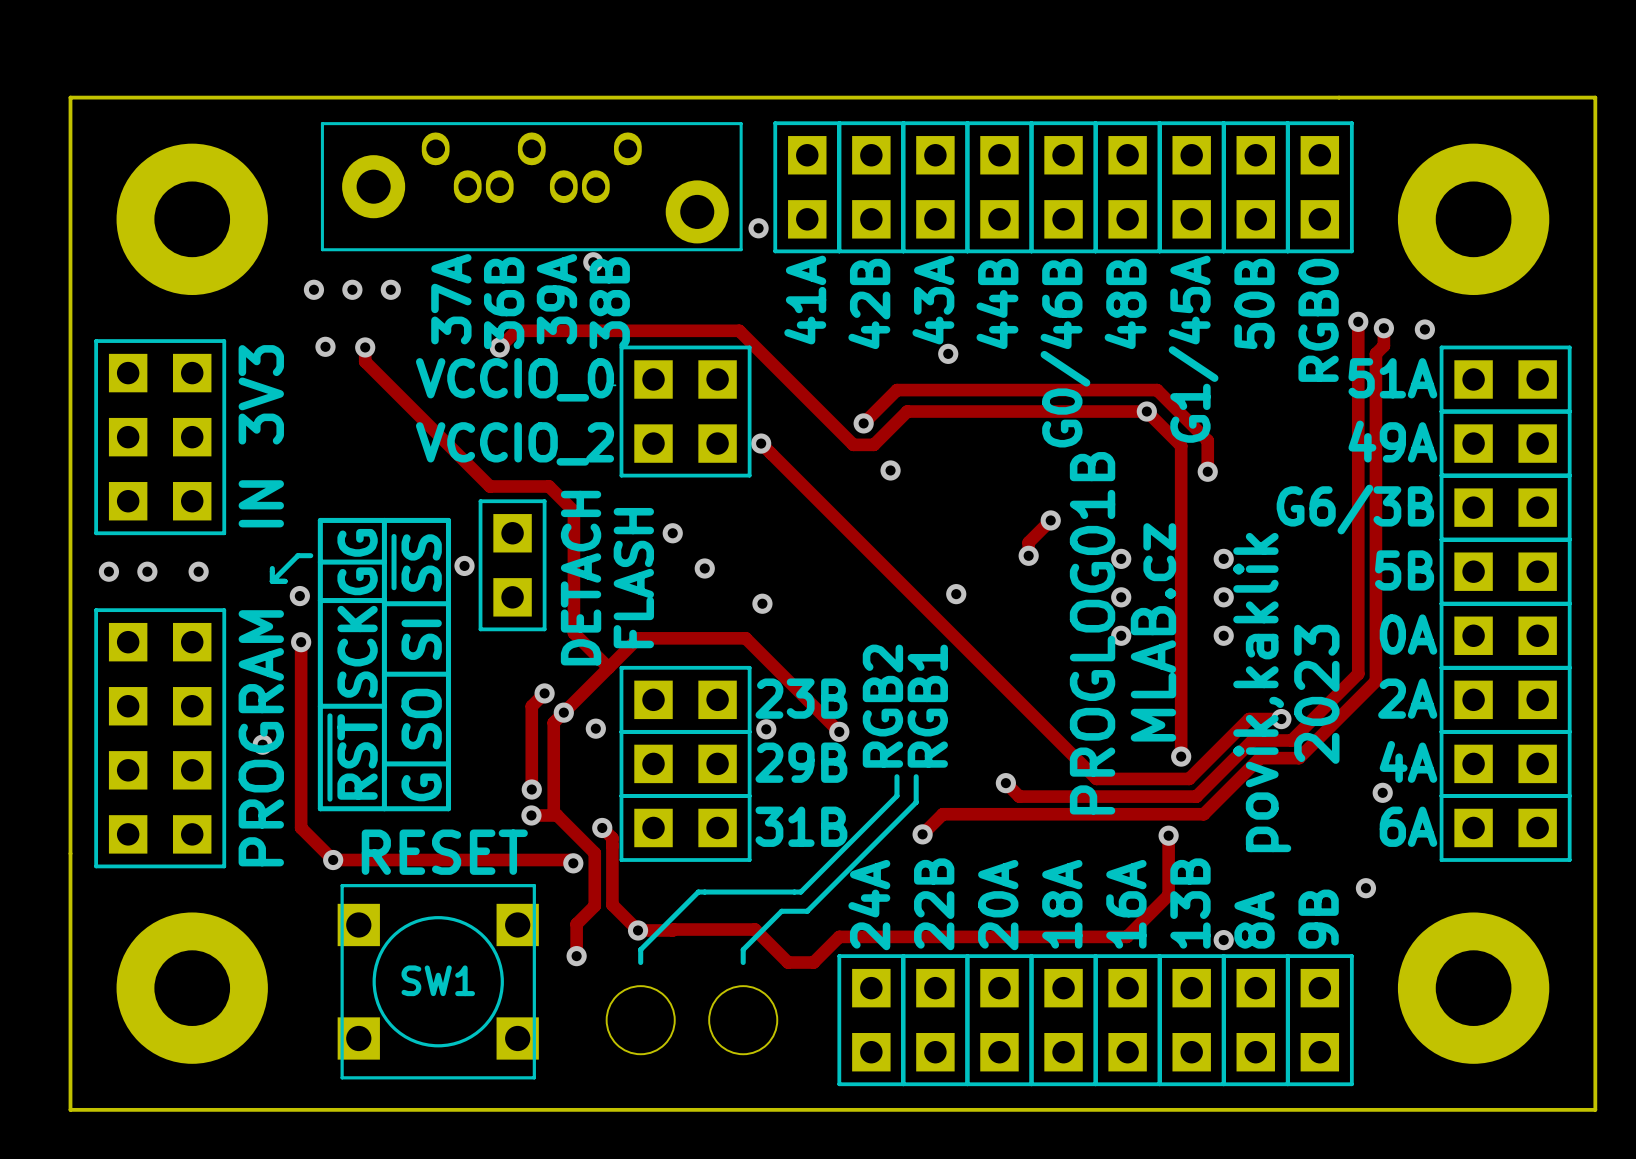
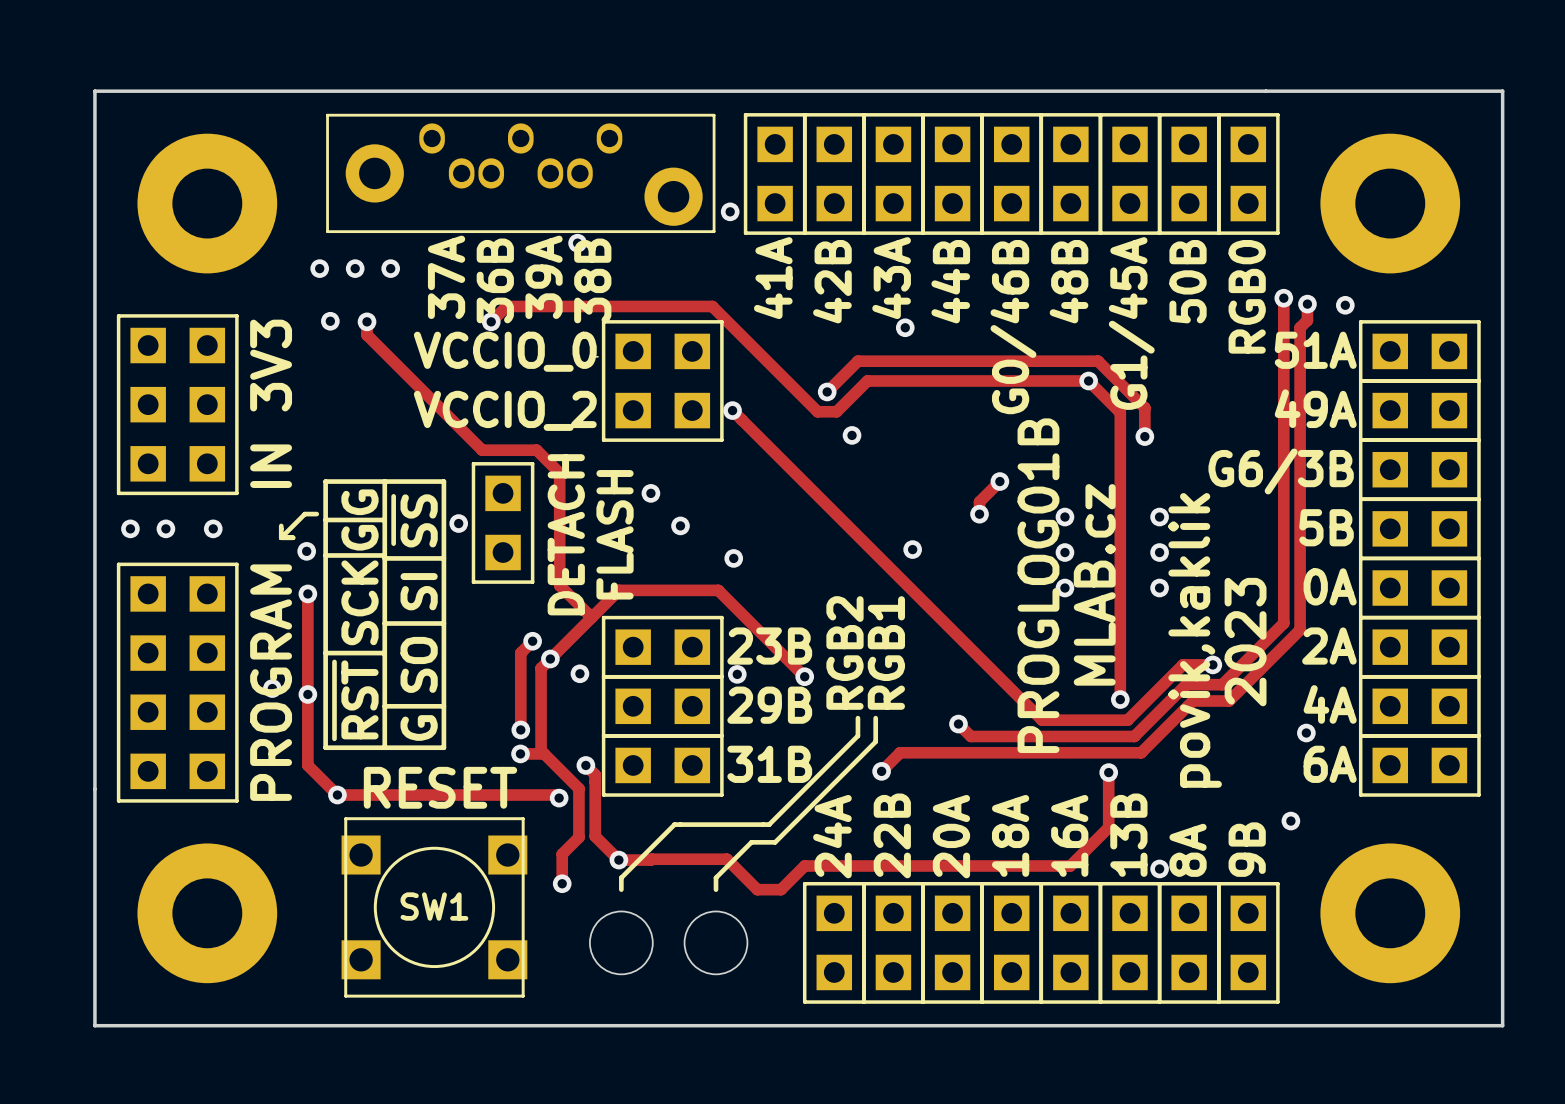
via: none -> (307, 694)

